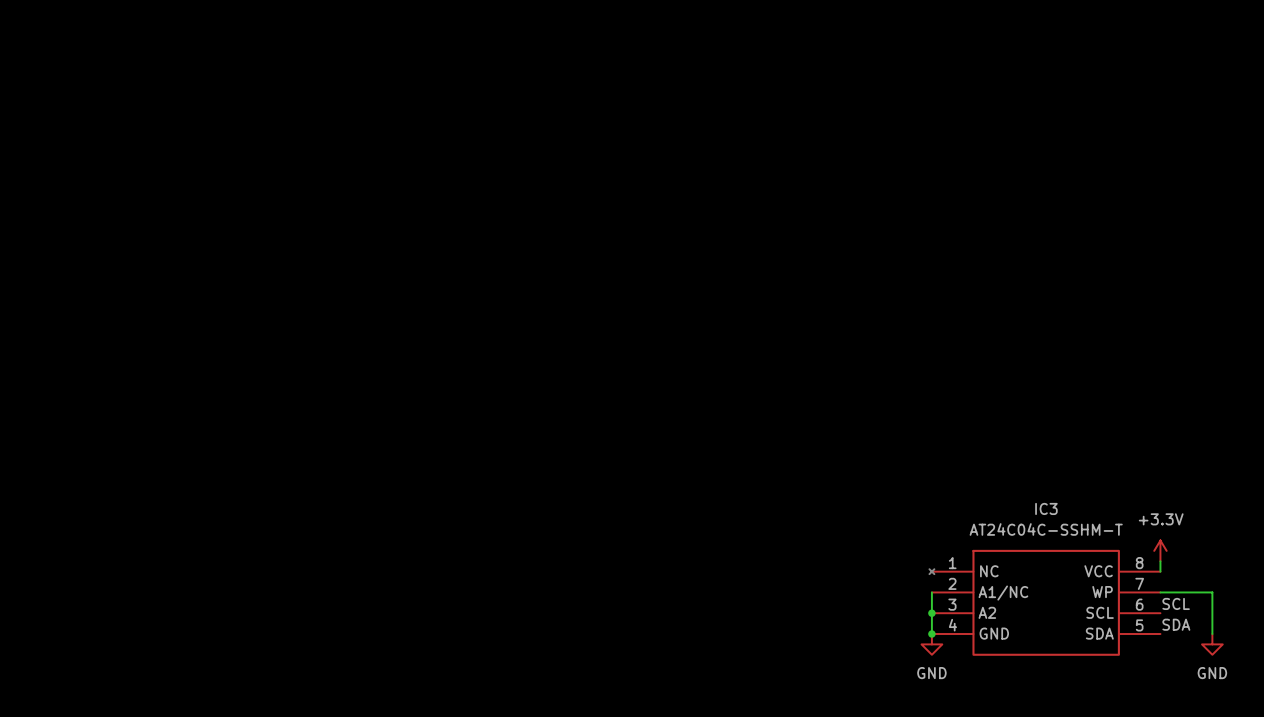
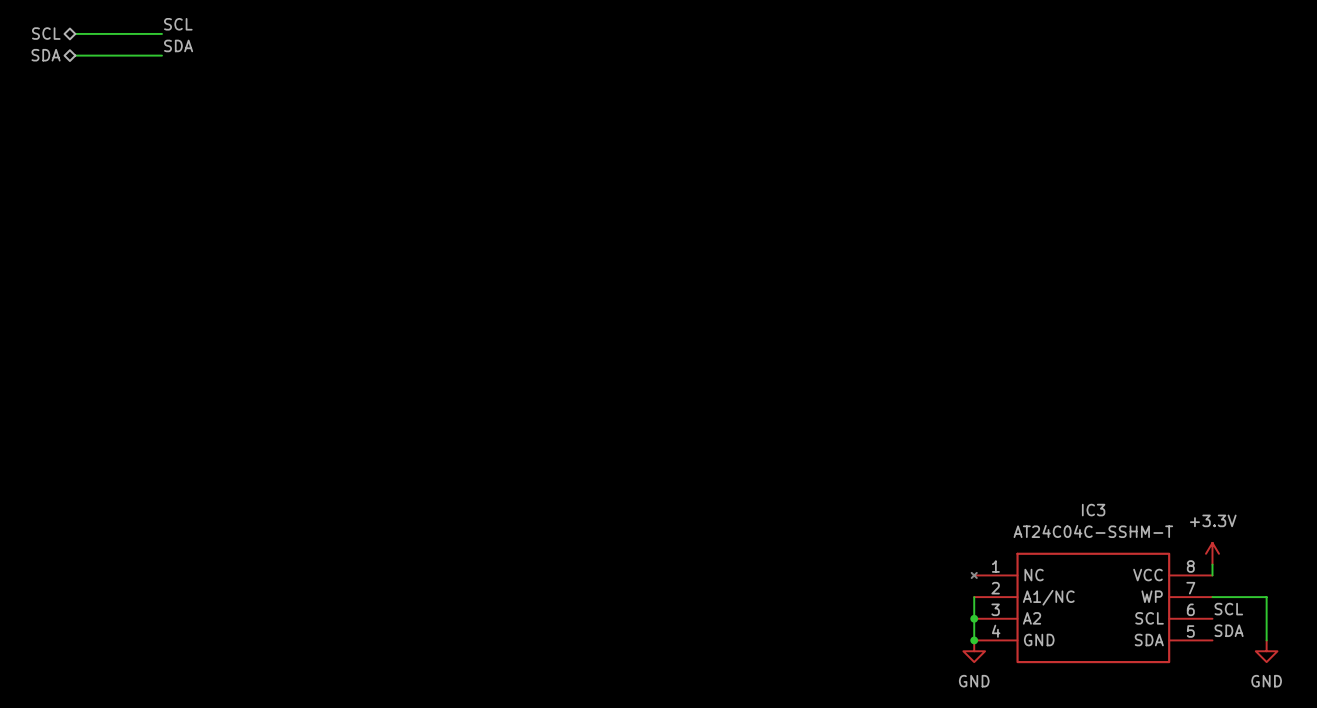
label: none -> SCL (178, 24)
hierarchical label: none -> SCL (46, 33)
wire: none -> (75, 33) (161, 33)
label: none -> SDA (178, 45)
hierarchical label: none -> SDA (46, 55)
wire: none -> (75, 55) (161, 55)

